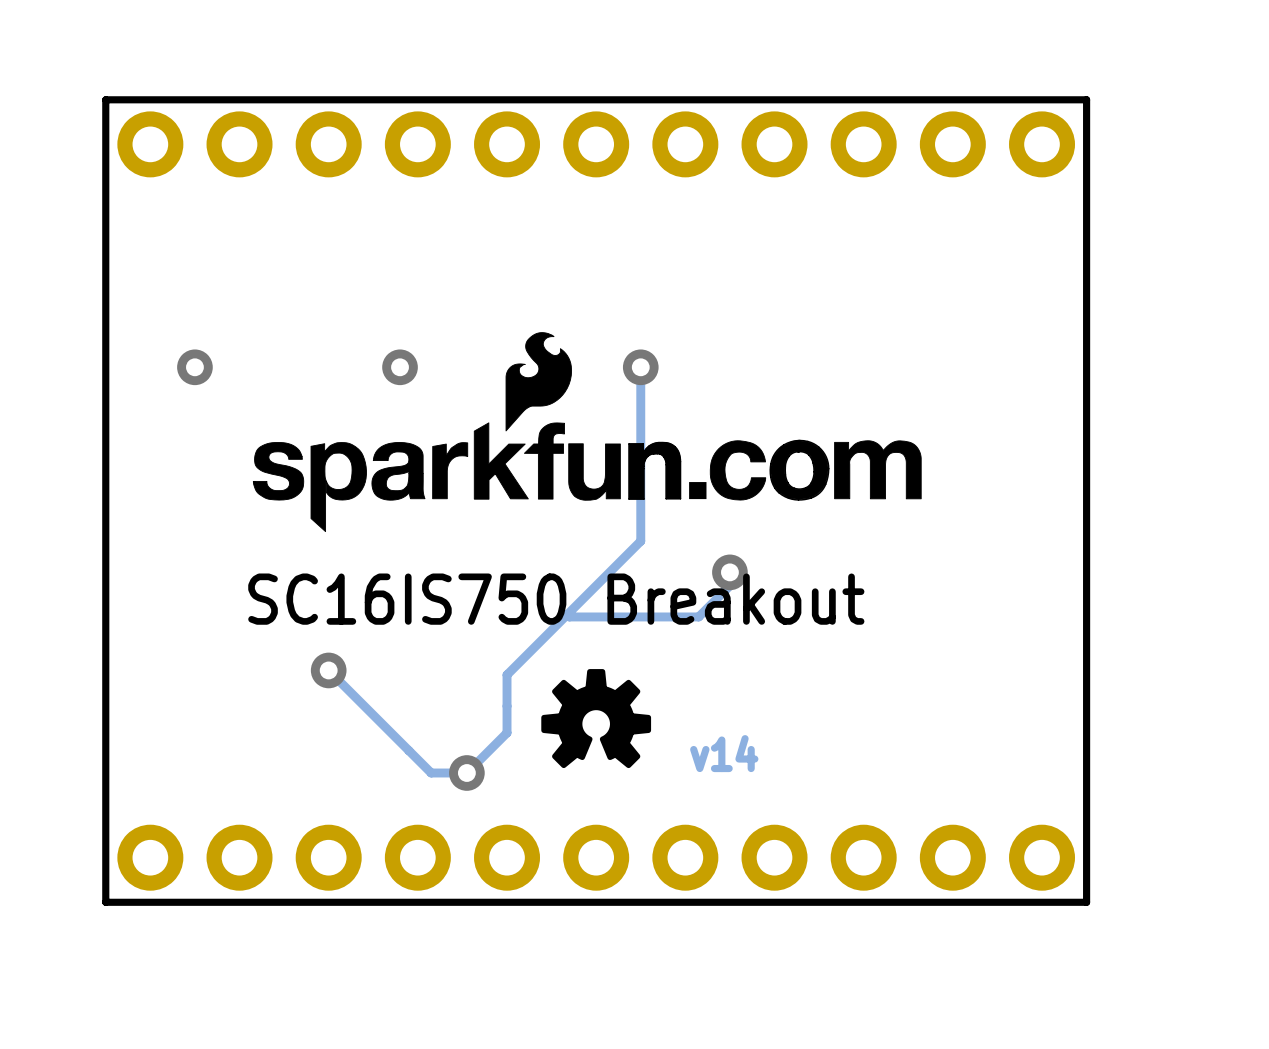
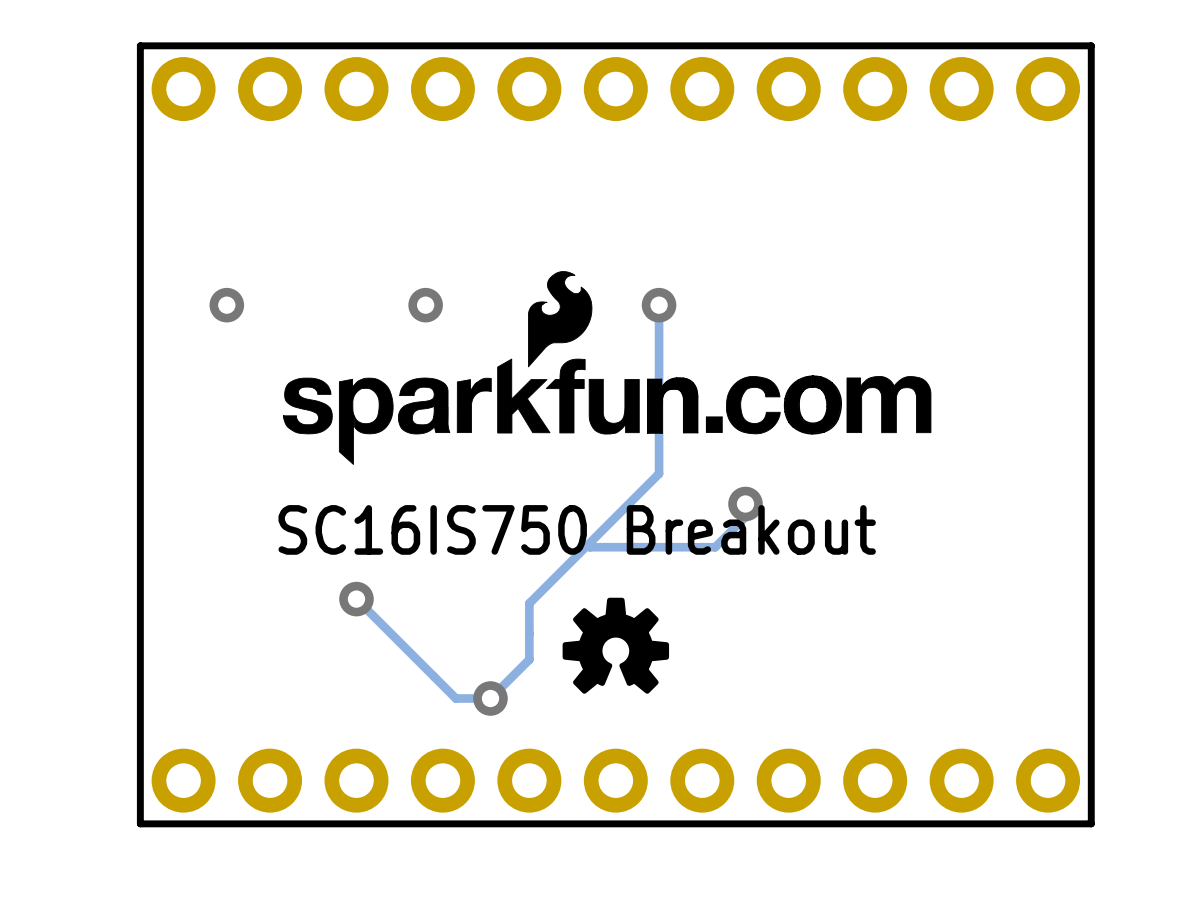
text: v14 (724, 753) -> none

